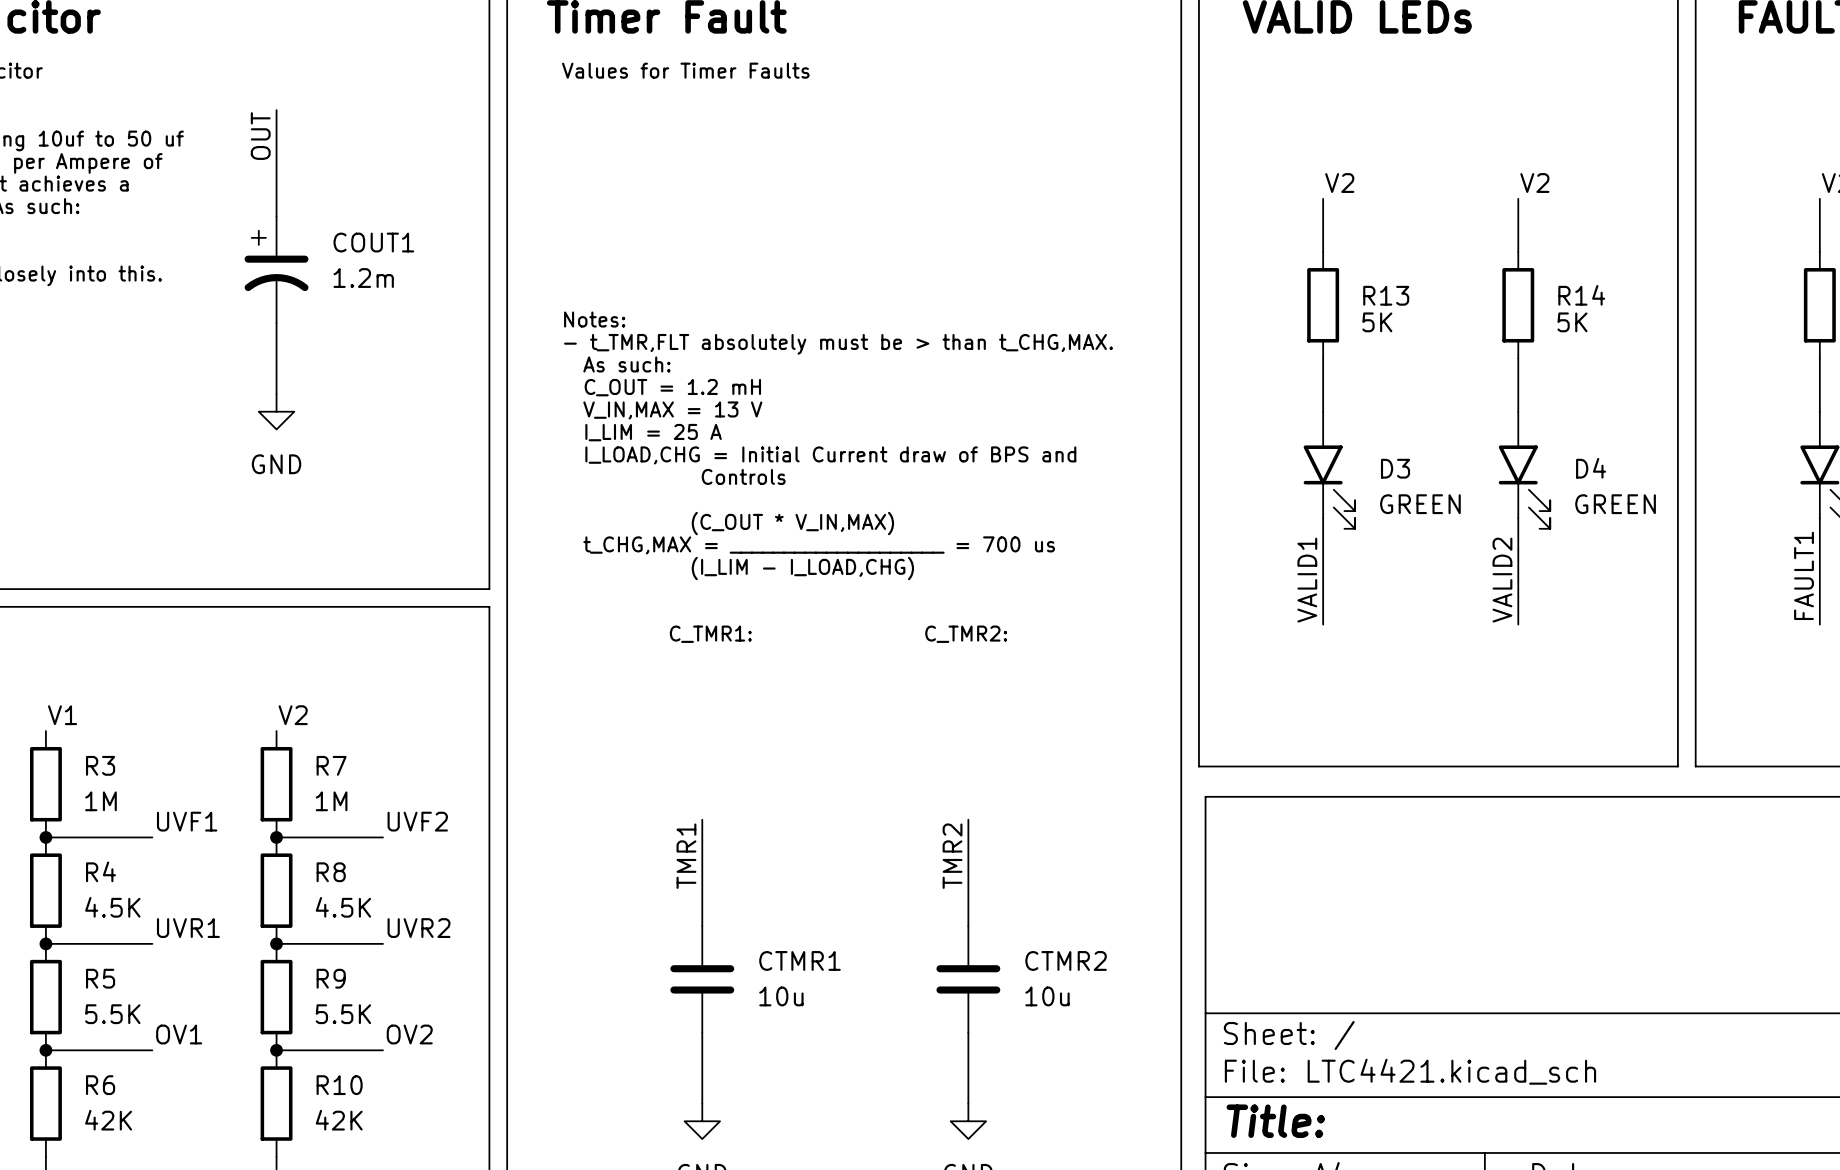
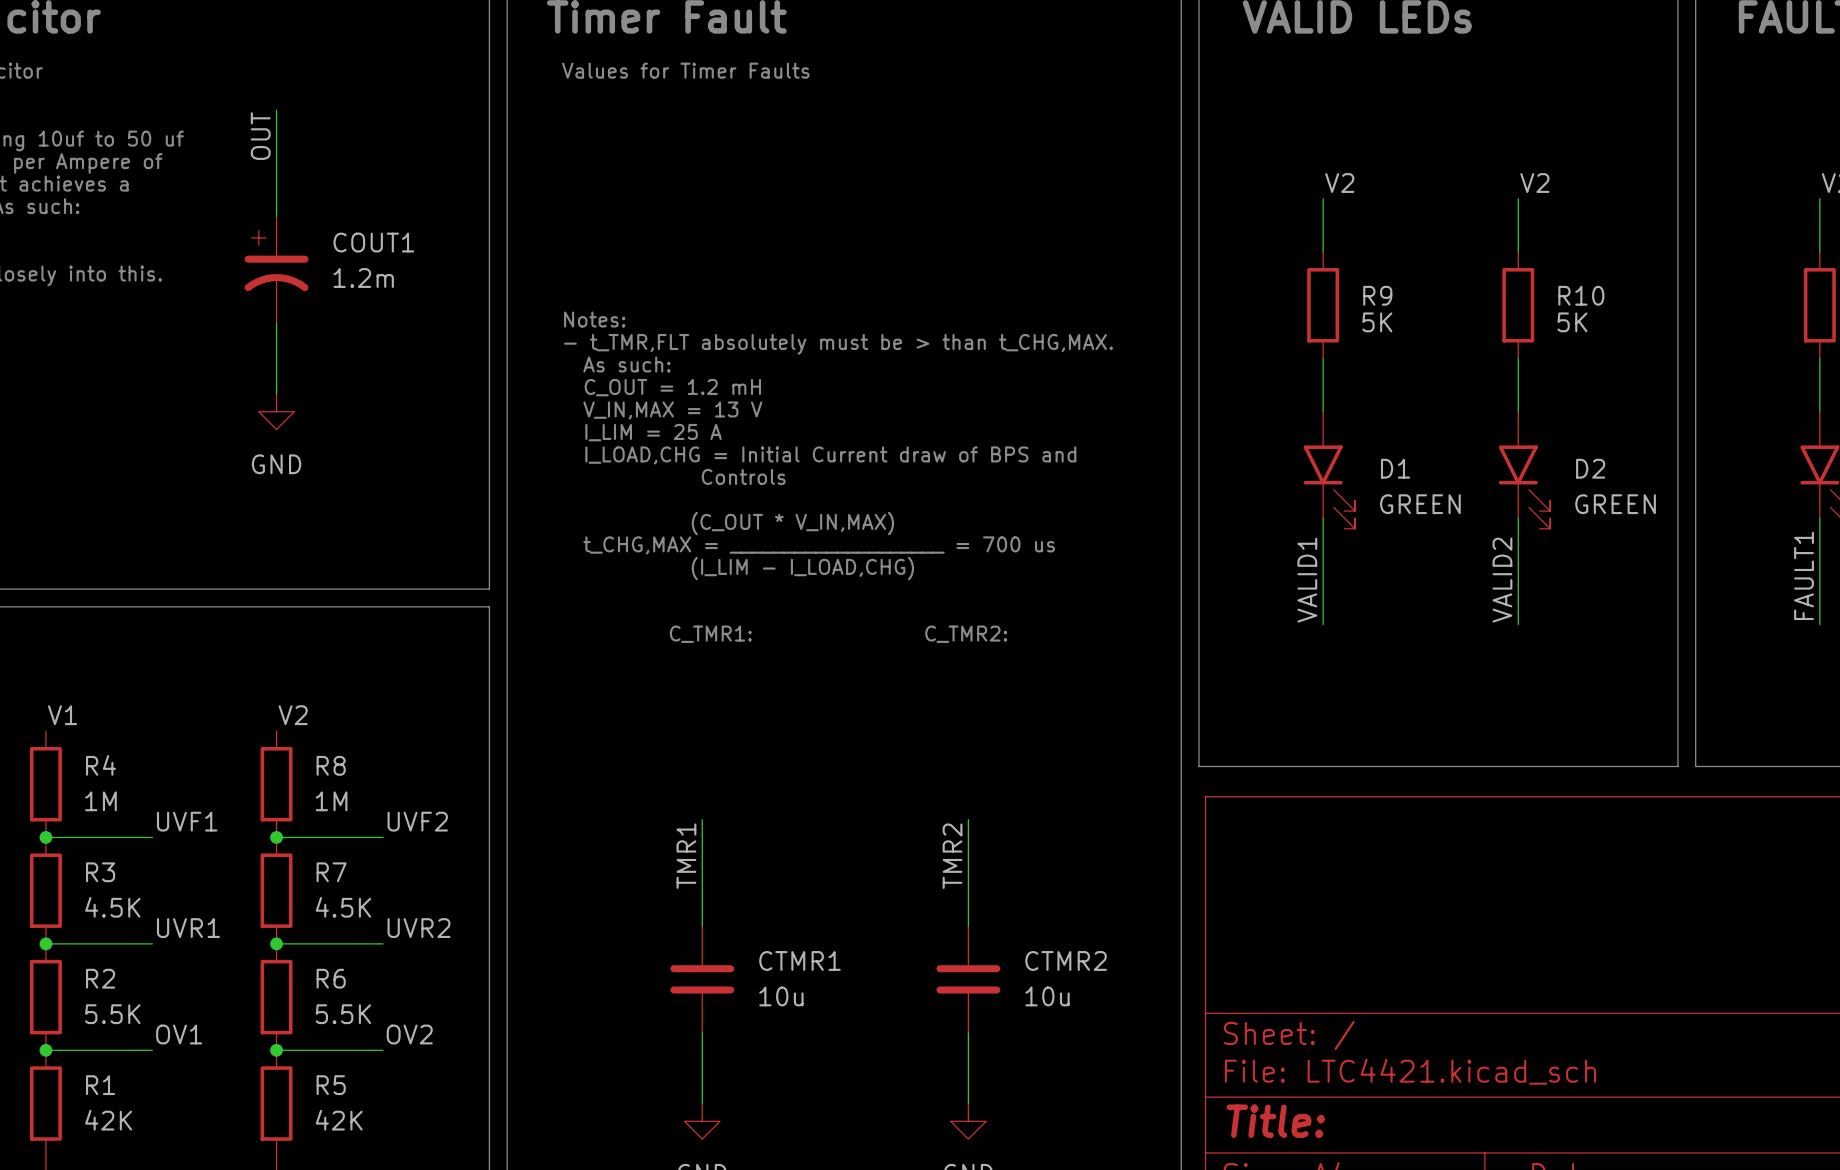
R13 name: R13 (1386, 295) -> R9 (1377, 295)
R14 name: R14 (1581, 295) -> R10 (1581, 295)
D3 name: D3 (1395, 468) -> D1 (1395, 468)
D4 name: D4 (1591, 468) -> D2 (1590, 468)
R3 name: R3 (100, 765) -> R4 (100, 765)
R7 name: R7 (331, 765) -> R8 (331, 765)
R4 name: R4 (100, 871) -> R3 (100, 872)
R8 name: R8 (331, 872) -> R7 (331, 872)
R5 name: R5 (100, 978) -> R2 (100, 978)
R9 name: R9 (331, 978) -> R6 (331, 978)
R6 name: R6 (100, 1085) -> R1 (100, 1085)
R10 name: R10 (339, 1085) -> R5 (331, 1085)

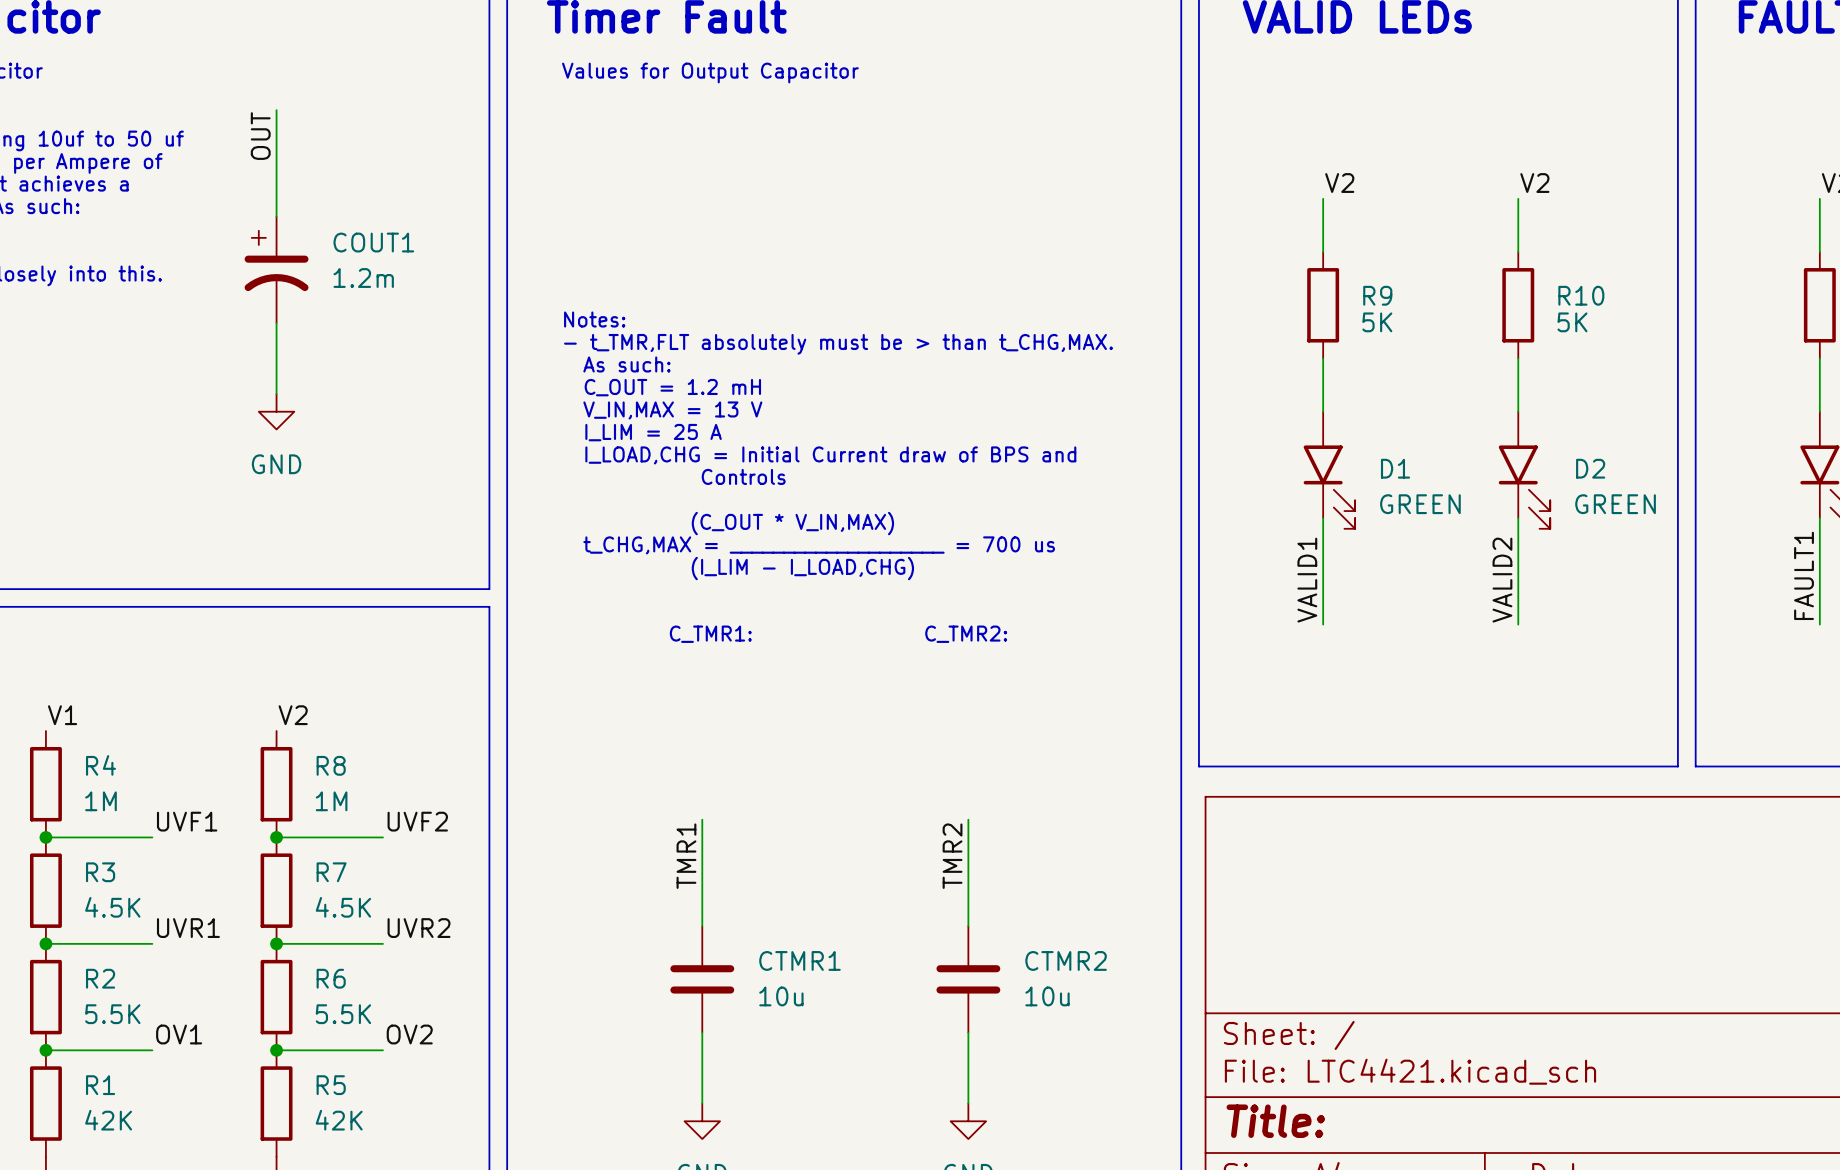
text: Values for Timer Faults (685, 70) -> Values for Output Capacitor (710, 72)

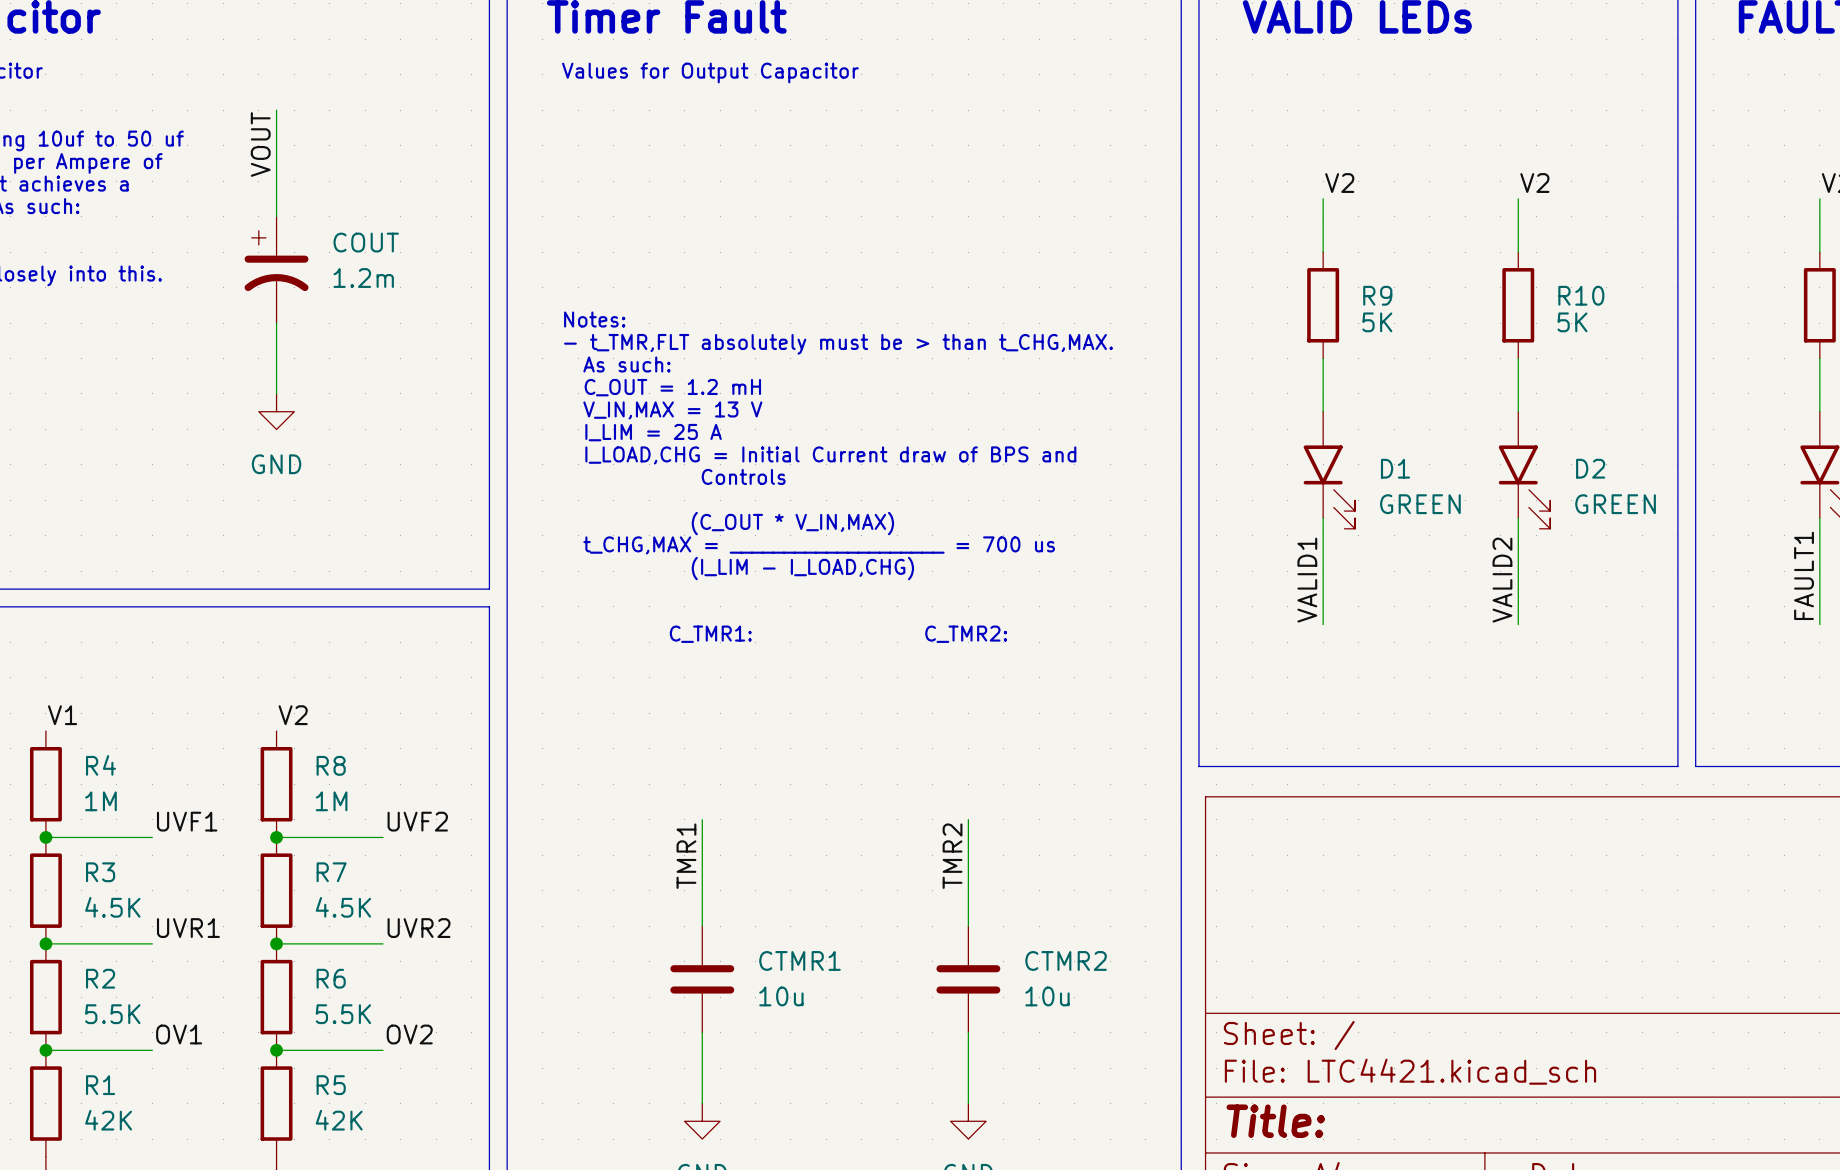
label: OUT (260, 136) -> VOUT (260, 144)
COUT1 name: COUT1 (373, 242) -> COUT (366, 242)

